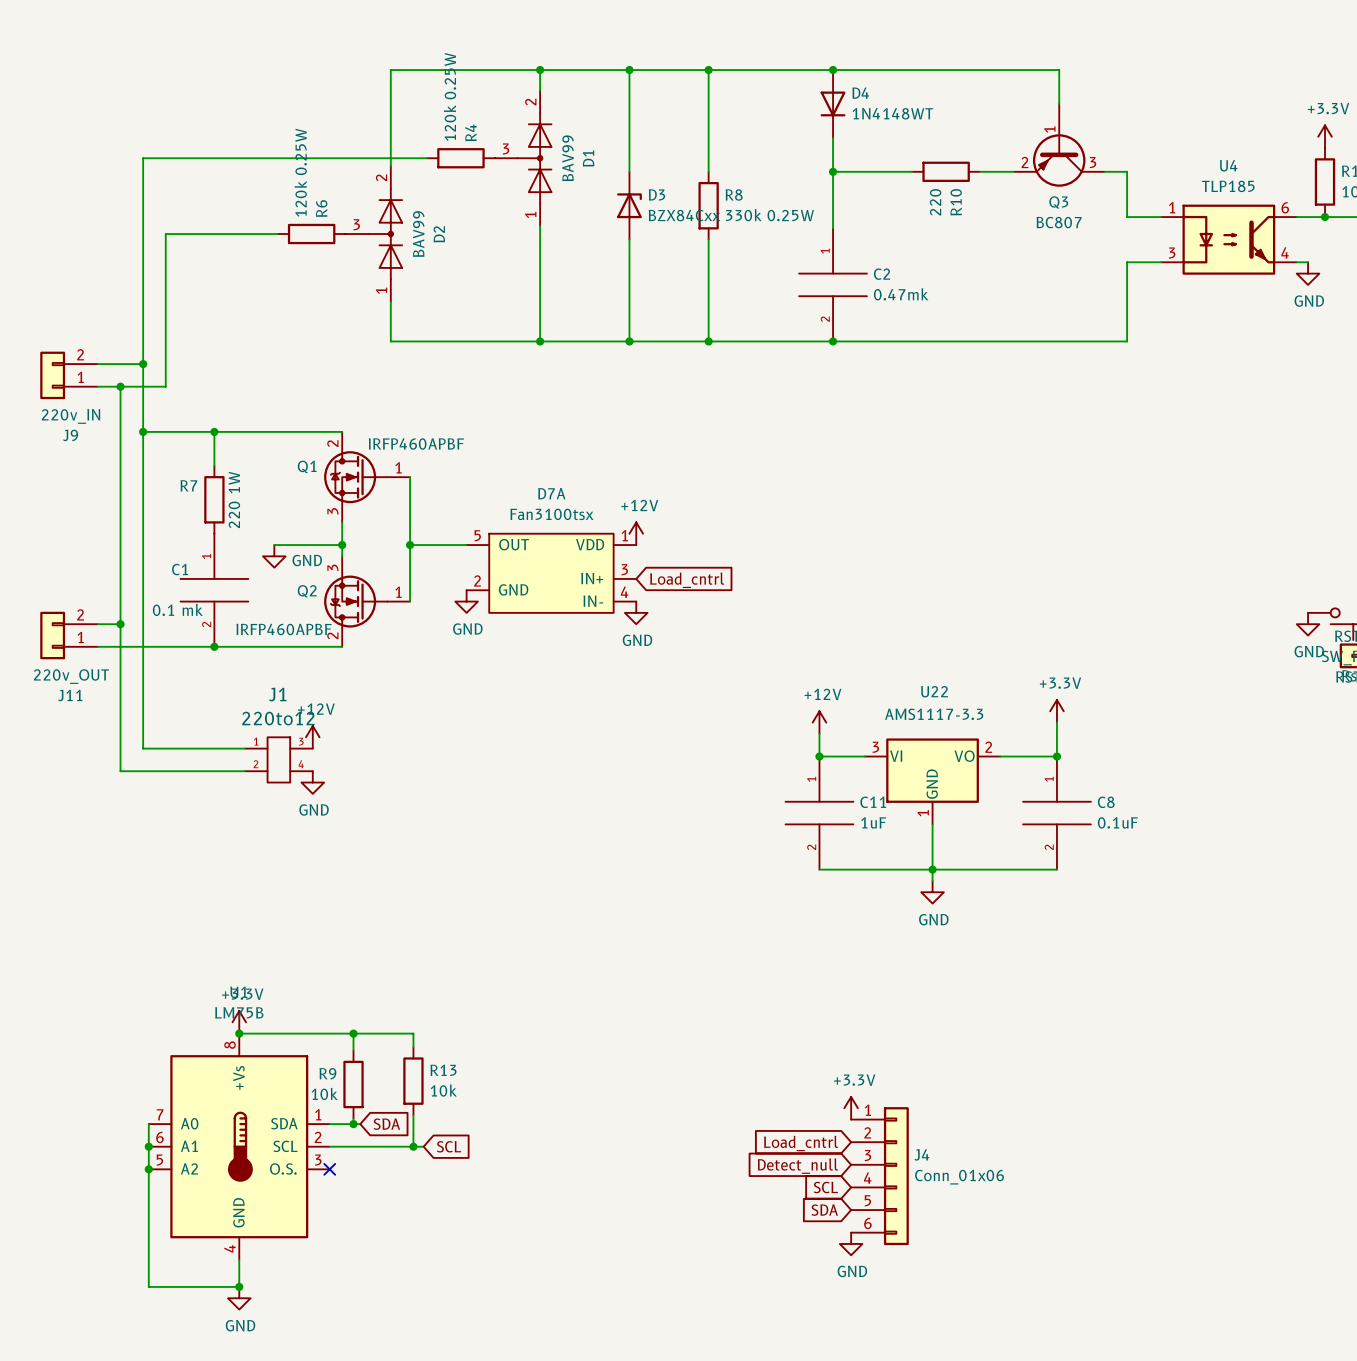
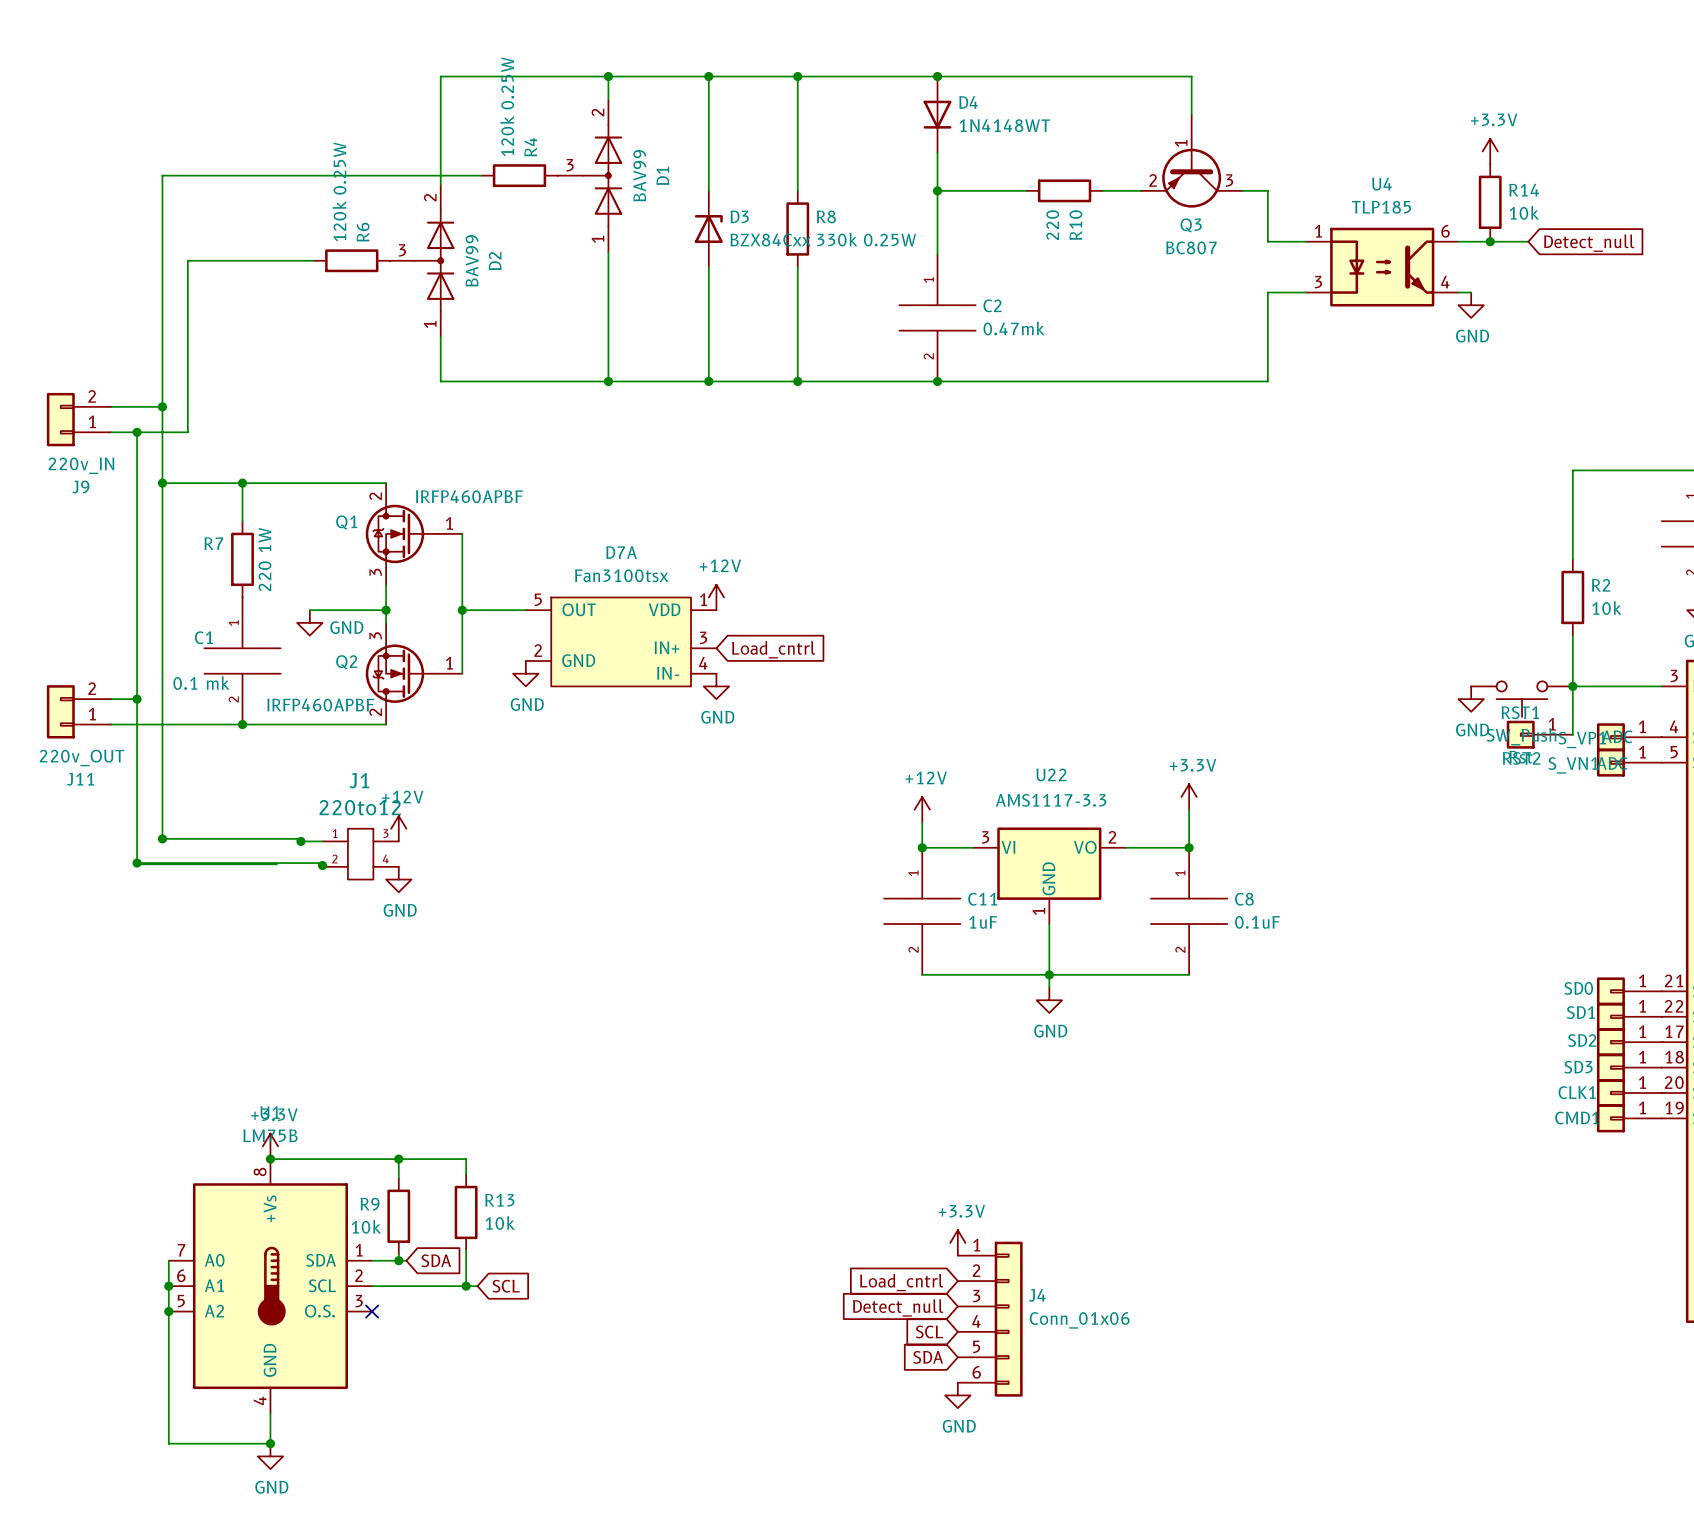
power symbol position: +12V (312, 737) -> +12V (398, 828)
junction: none -> (162, 838)
wire: none -> (299, 841) (322, 841)
junction: none -> (300, 841)
J1 position: (278, 759) -> (360, 854)
wire: none -> (137, 863) (322, 863) (322, 866)
junction: none -> (137, 863)
junction: none -> (322, 865)
power symbol position: GND (312, 782) -> GND (398, 879)

